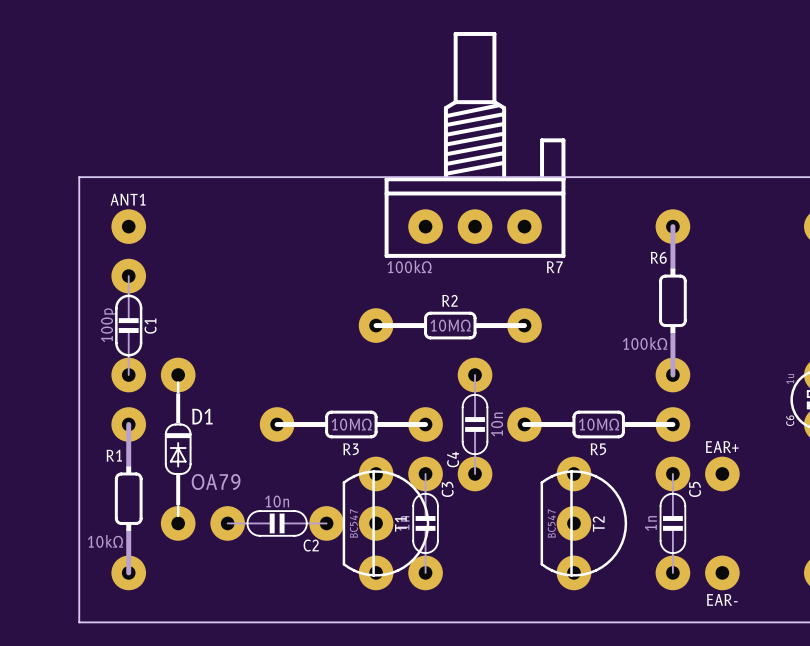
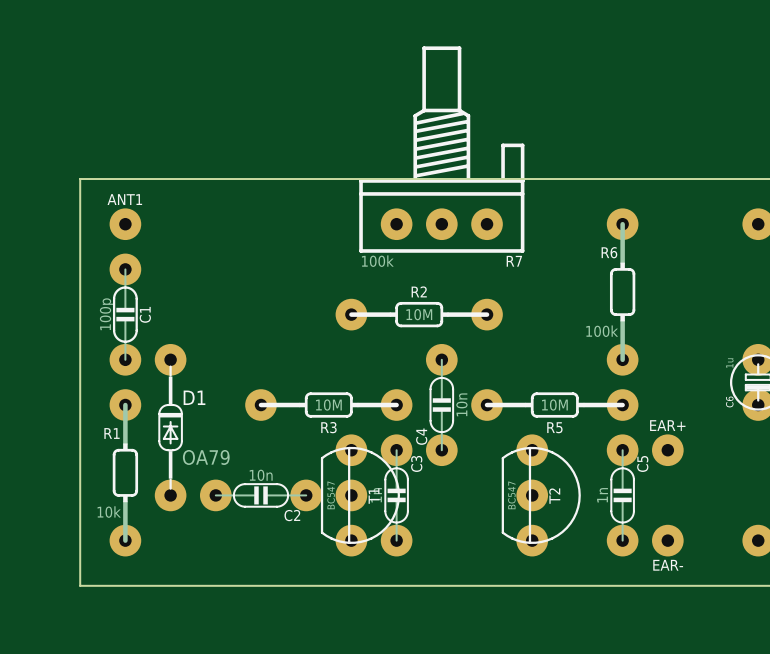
R7 value: 100kΩ (409, 266) -> 100k (377, 261)
R2 value: 10MΩ (450, 325) -> 10M (419, 314)
R6 value: 100kΩ (645, 343) -> 100k (602, 331)
R3 value: 10MΩ (351, 424) -> 10M (328, 405)
R5 value: 10MΩ (599, 424) -> 10M (554, 405)
R1 value: 10kΩ (105, 541) -> 10k (109, 512)

